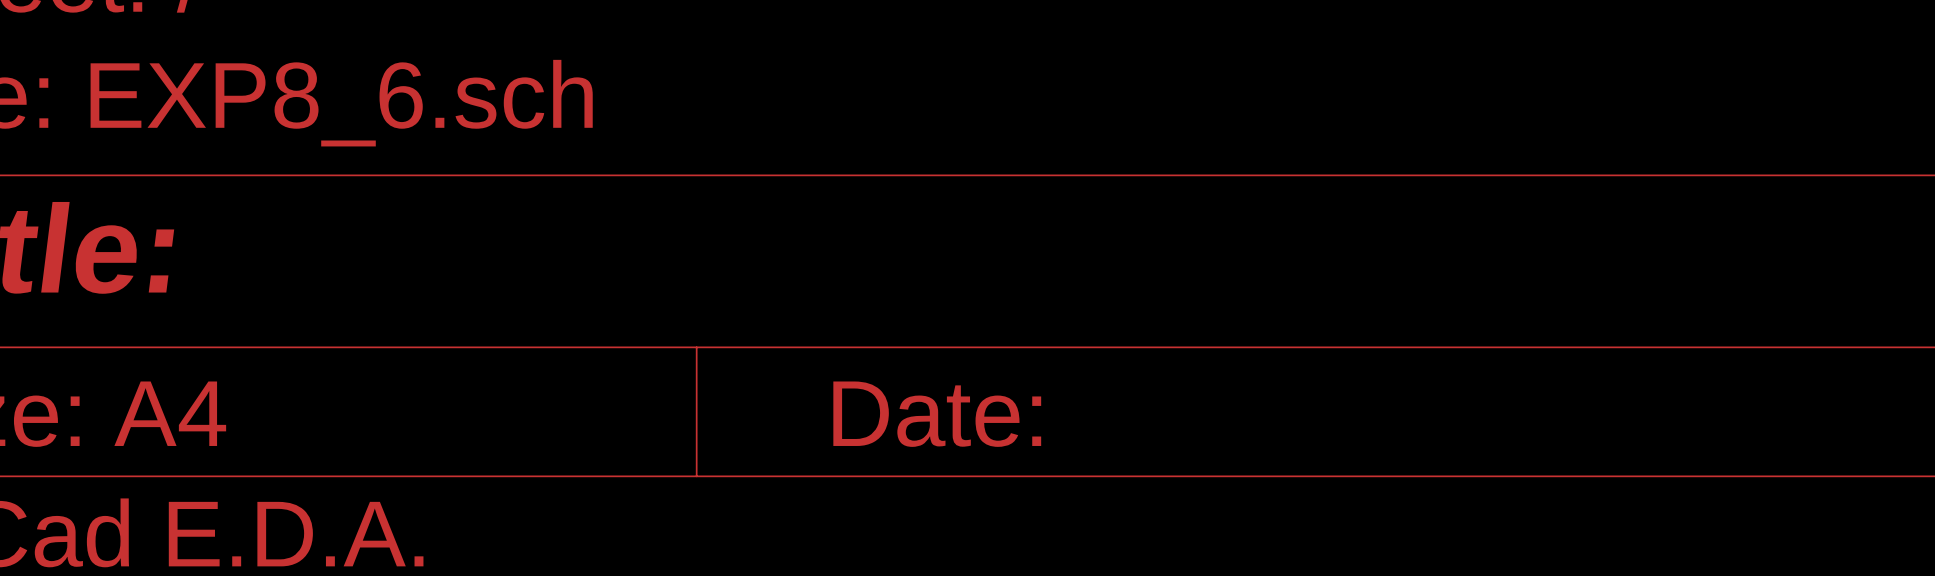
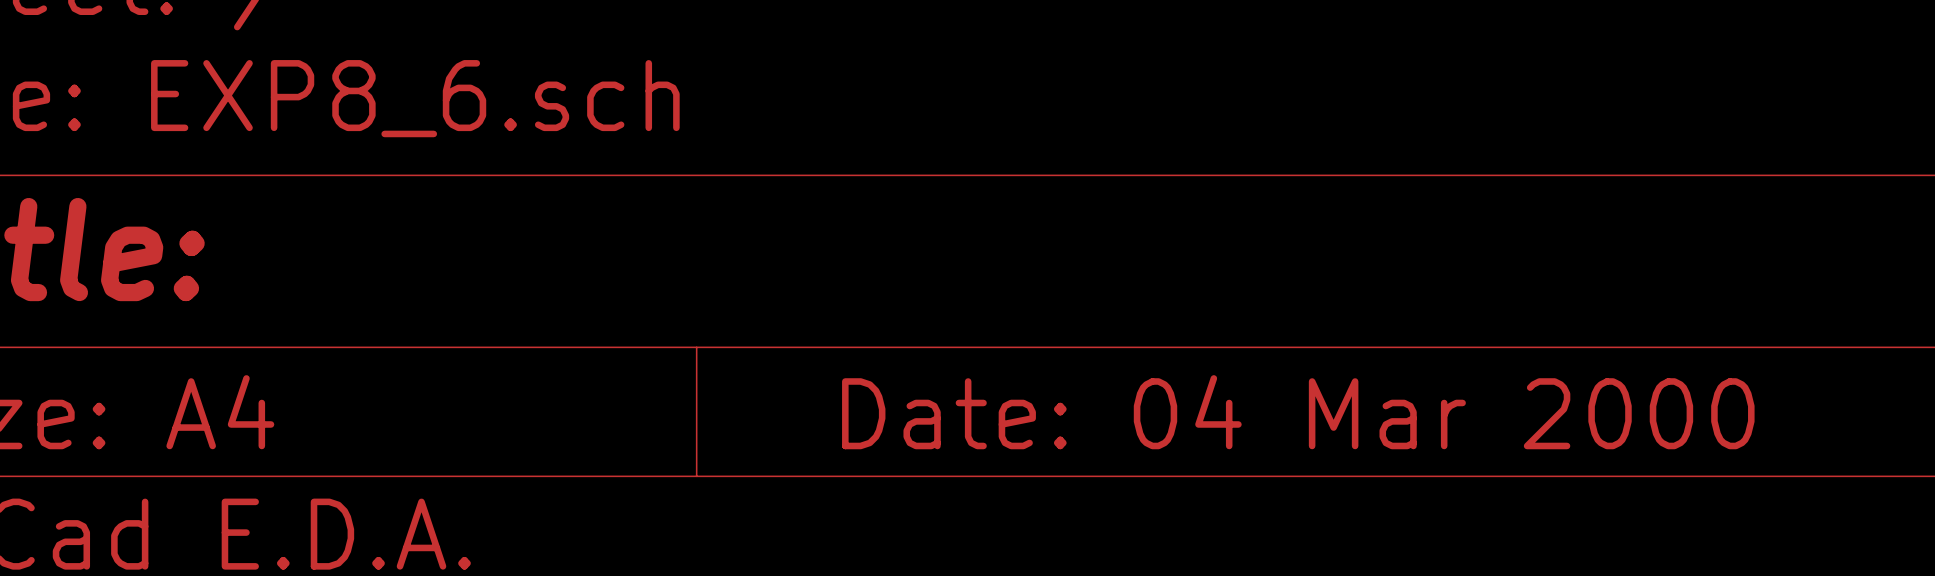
title block: Date: (937, 414) -> Date: 04 Mar 2000 (1298, 412)

